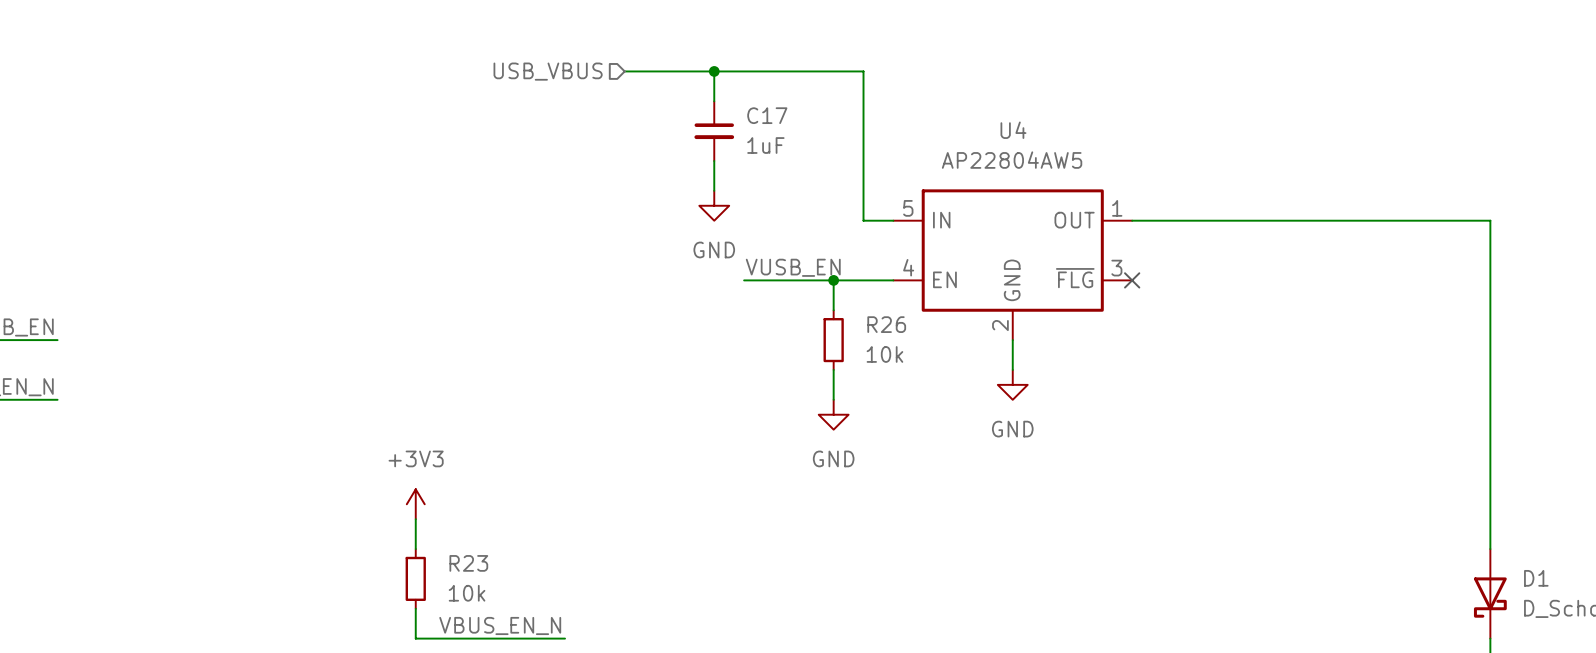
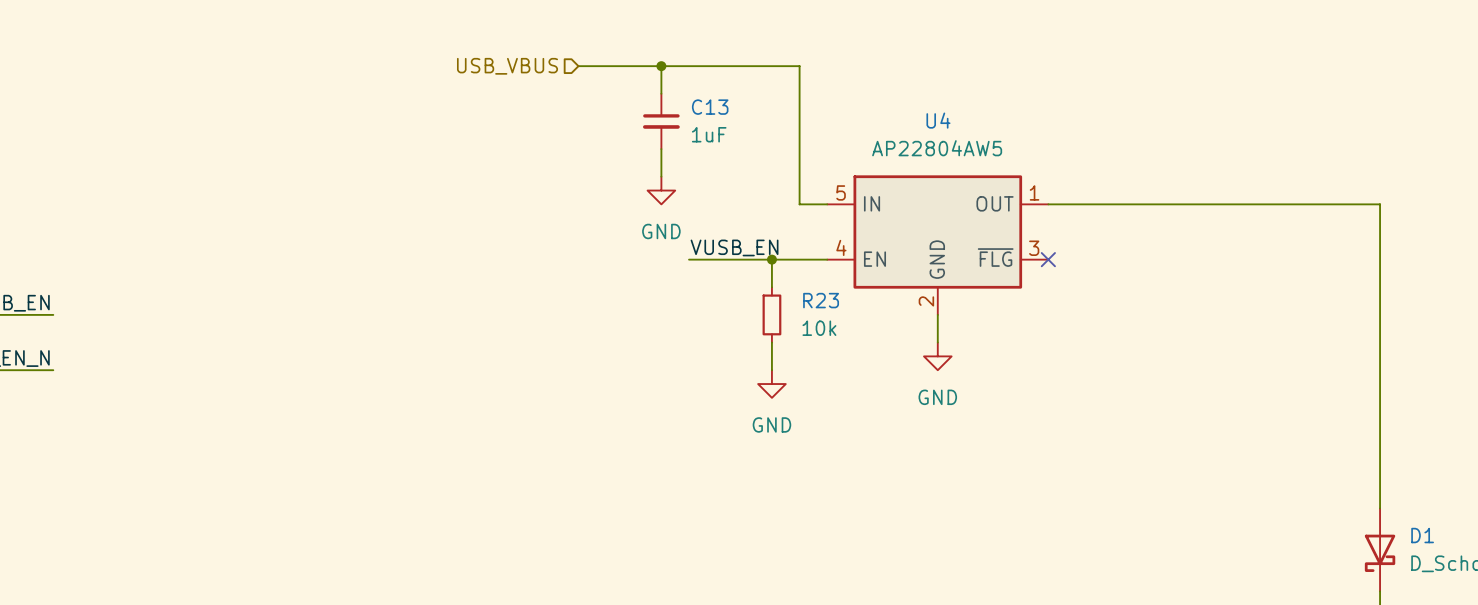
C17 name: C17 (767, 115) -> C13 (710, 107)
R26 name: R26 (886, 324) -> R23 (821, 300)
power symbol: +3V3 (415, 504) -> none
wire: (415, 519) (415, 549) -> none
R23: 10k (415, 578) -> none
wire: (415, 608) (415, 638) (565, 638) -> none
label: VBUS_EN_N (500, 625) -> none

